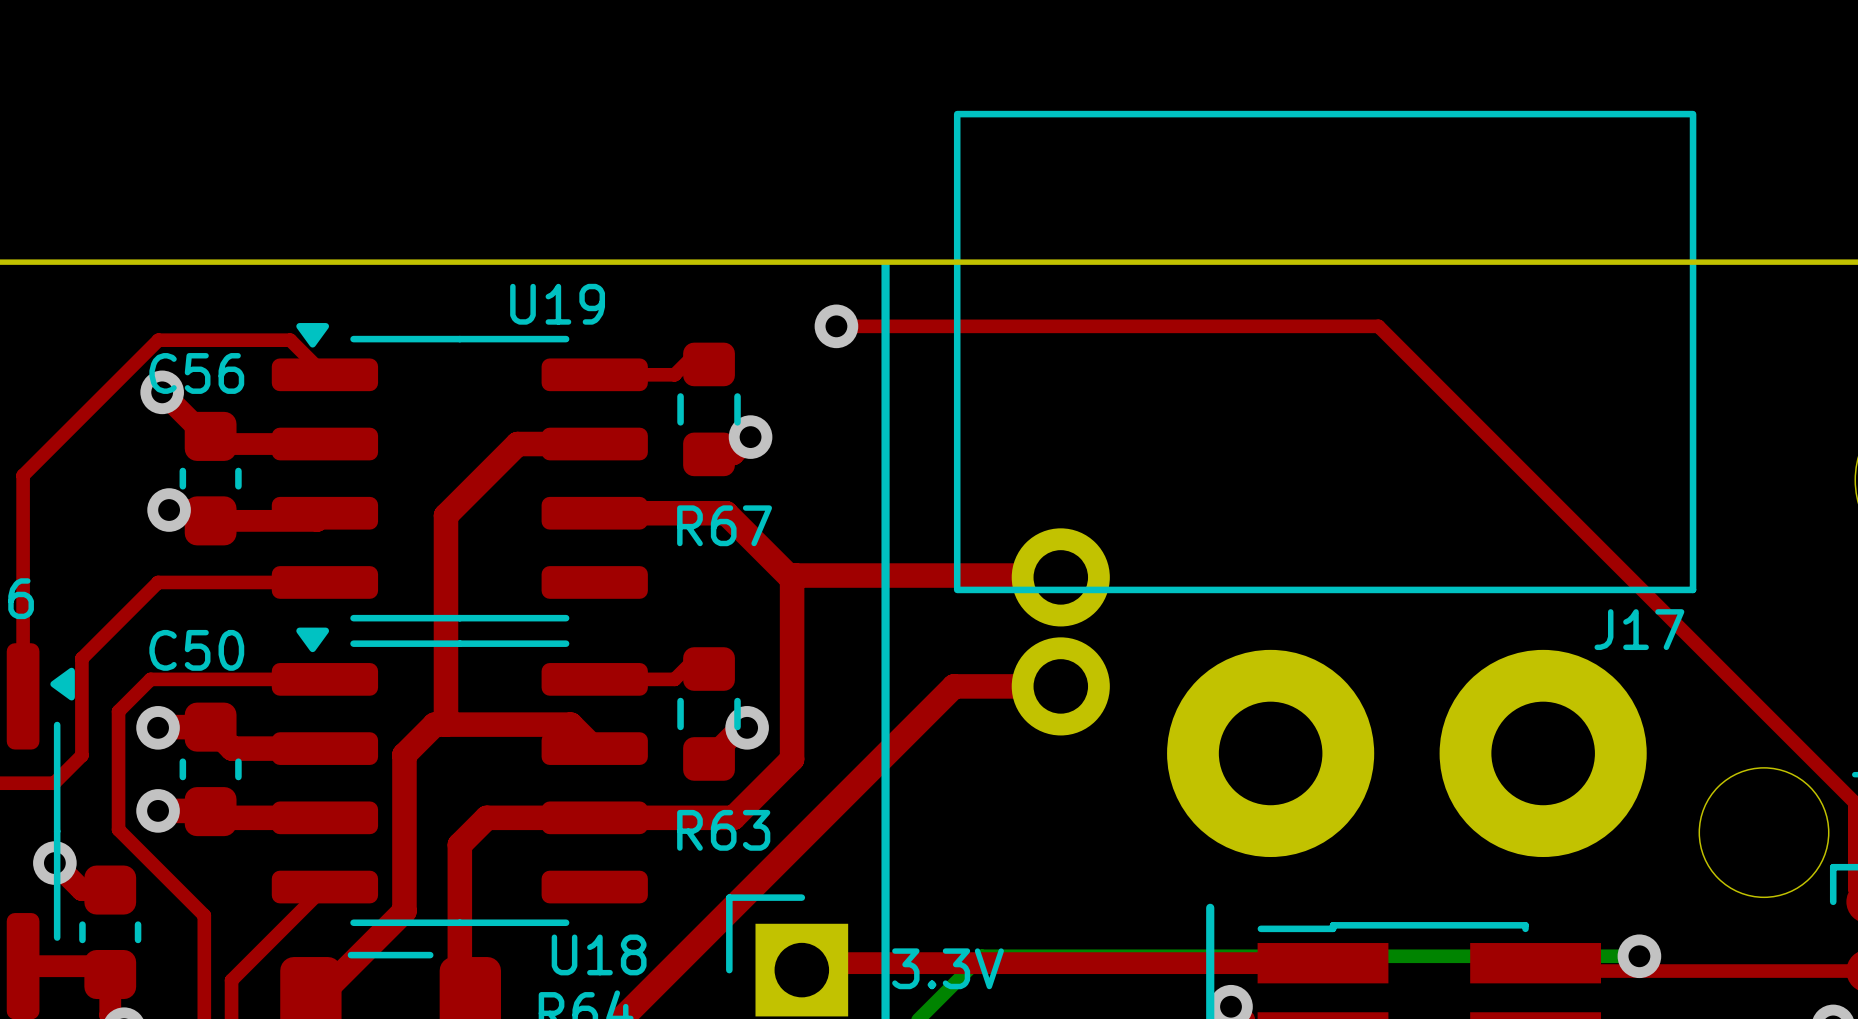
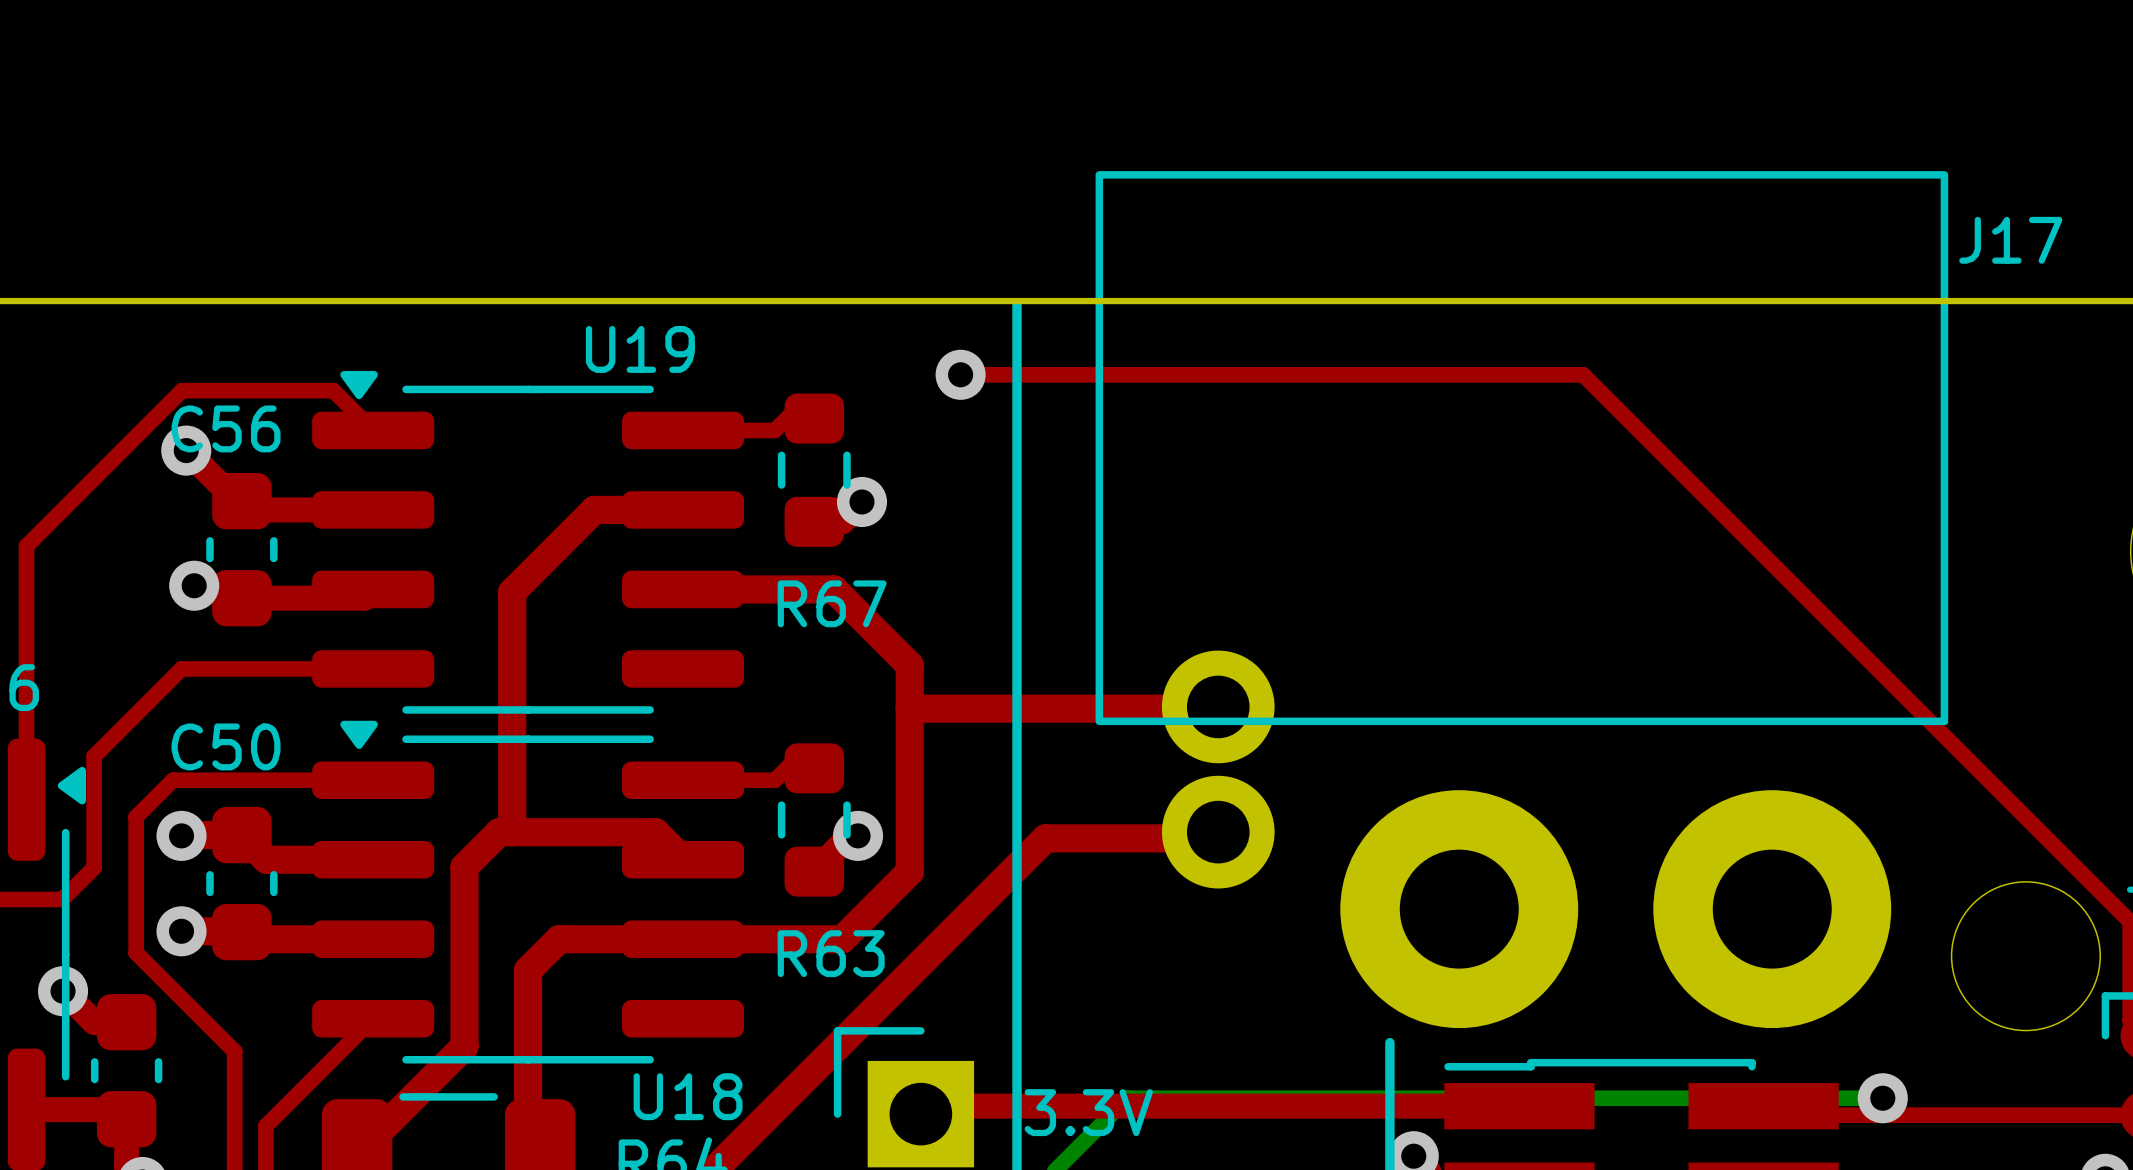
J17 position: (1325, 483) -> (1521, 599)
top track: (1060, 577) (1058, 575) (795, 575) (792, 579) -> none
top track: none -> (909, 708) (1213, 708)
J17 name position: J17 (1639, 629) -> J17 (2010, 240)
top track: (1060, 686) (954, 686) (910, 730) -> (1212, 838) (1045, 838)

